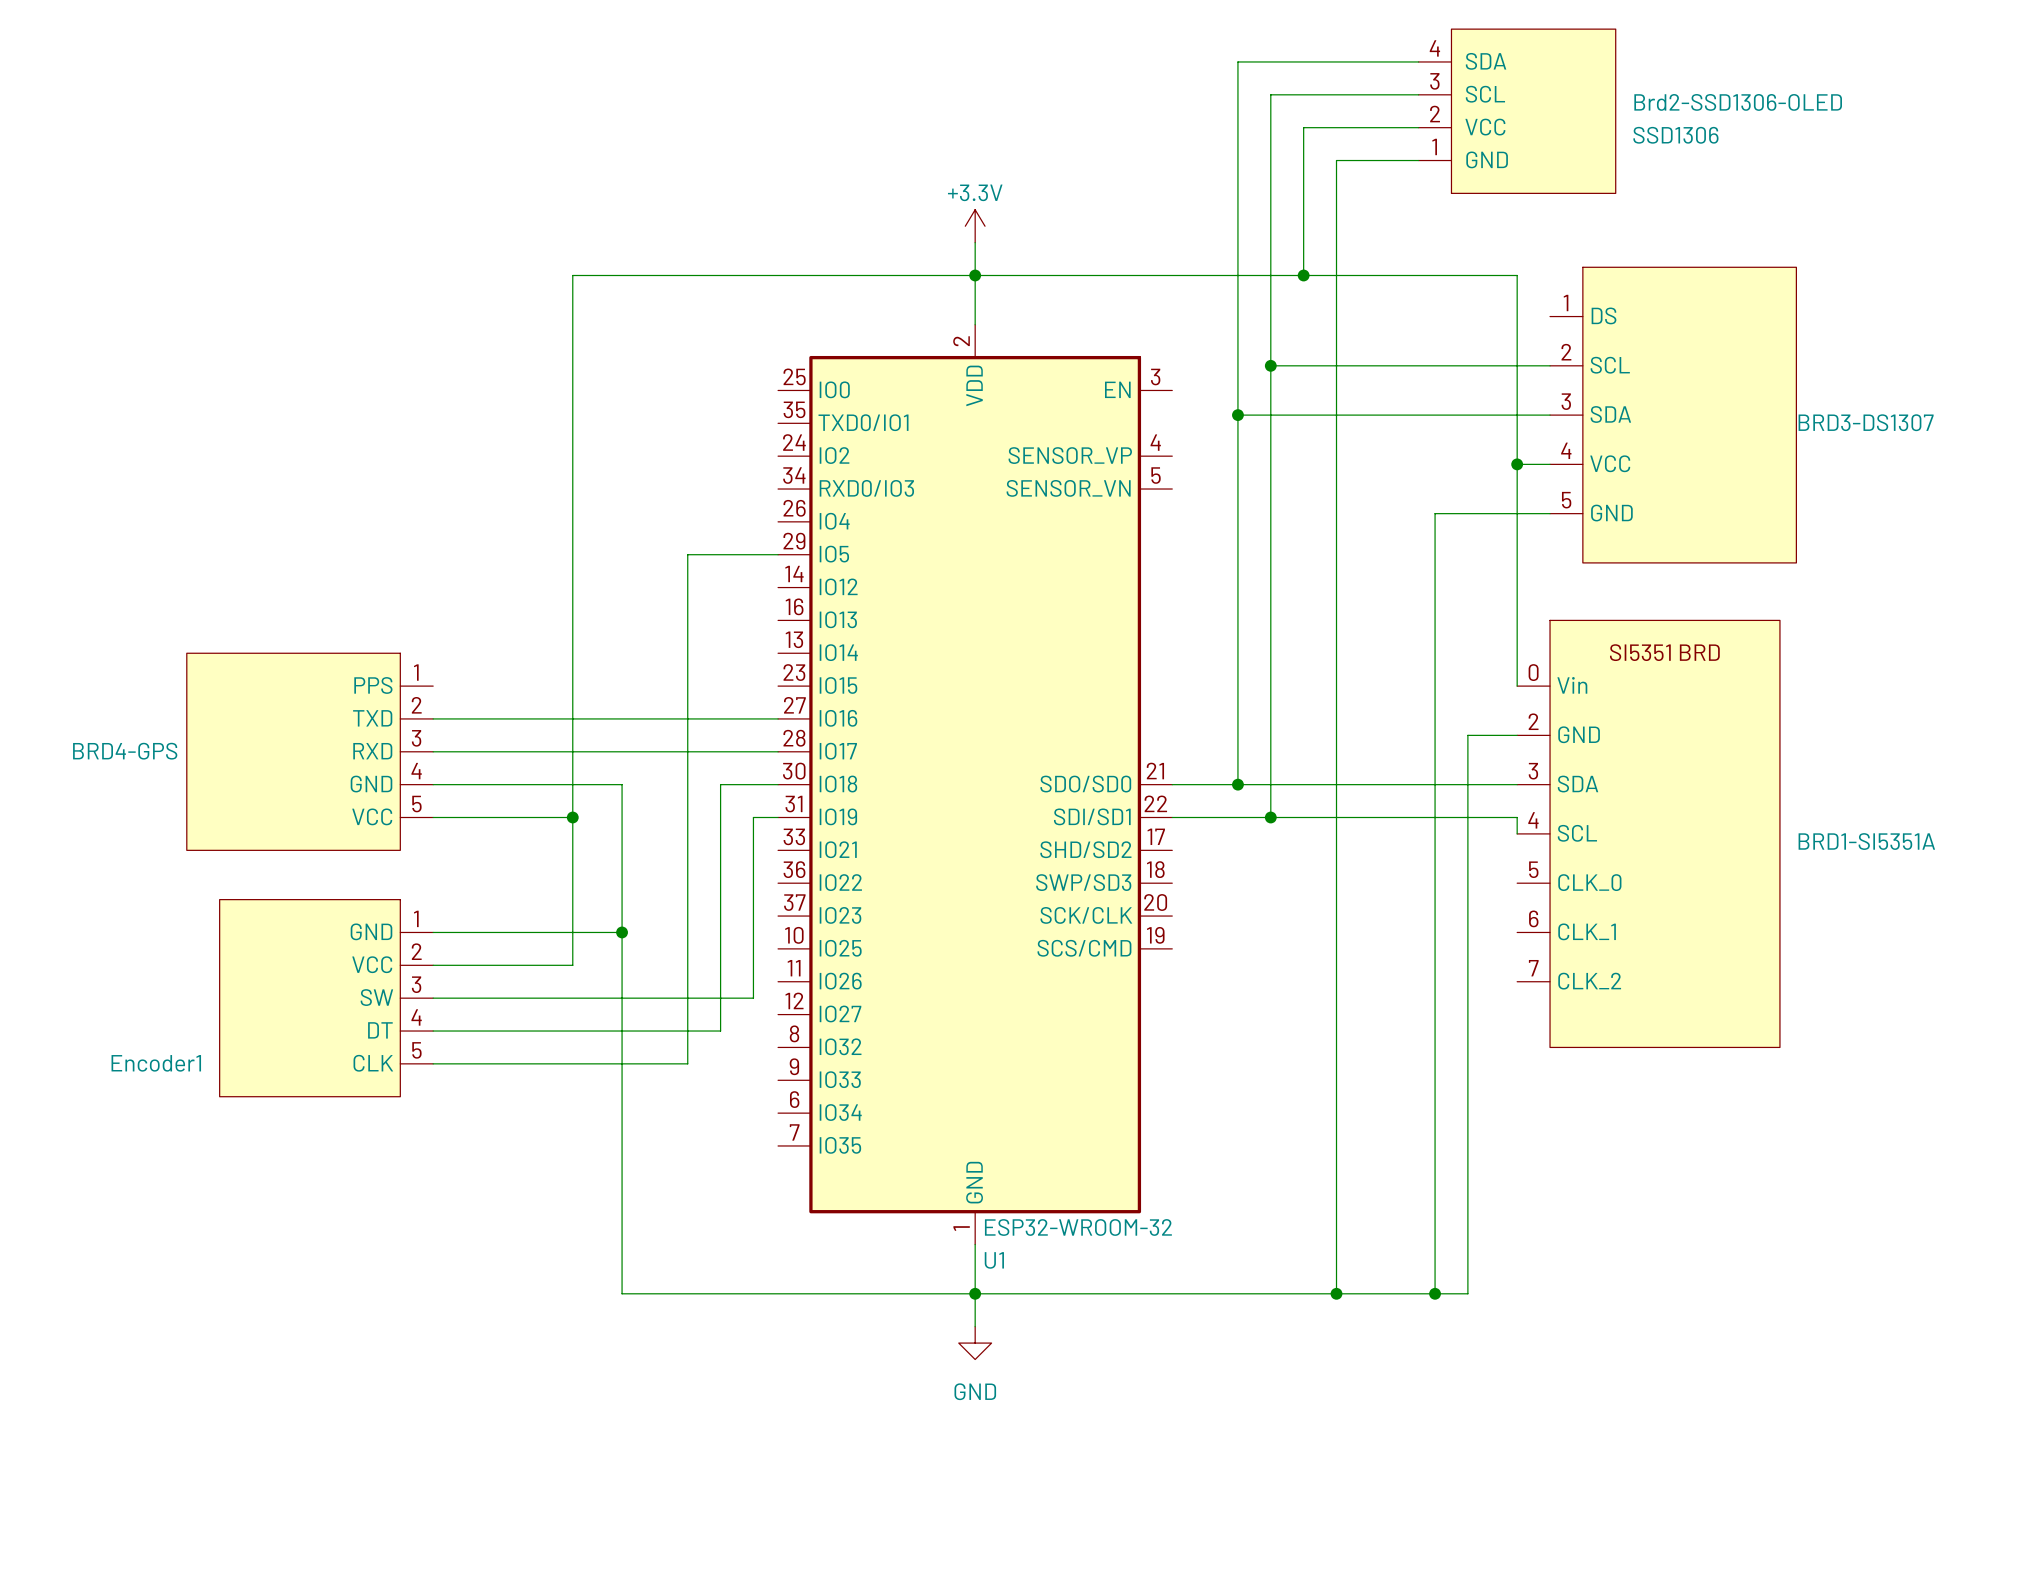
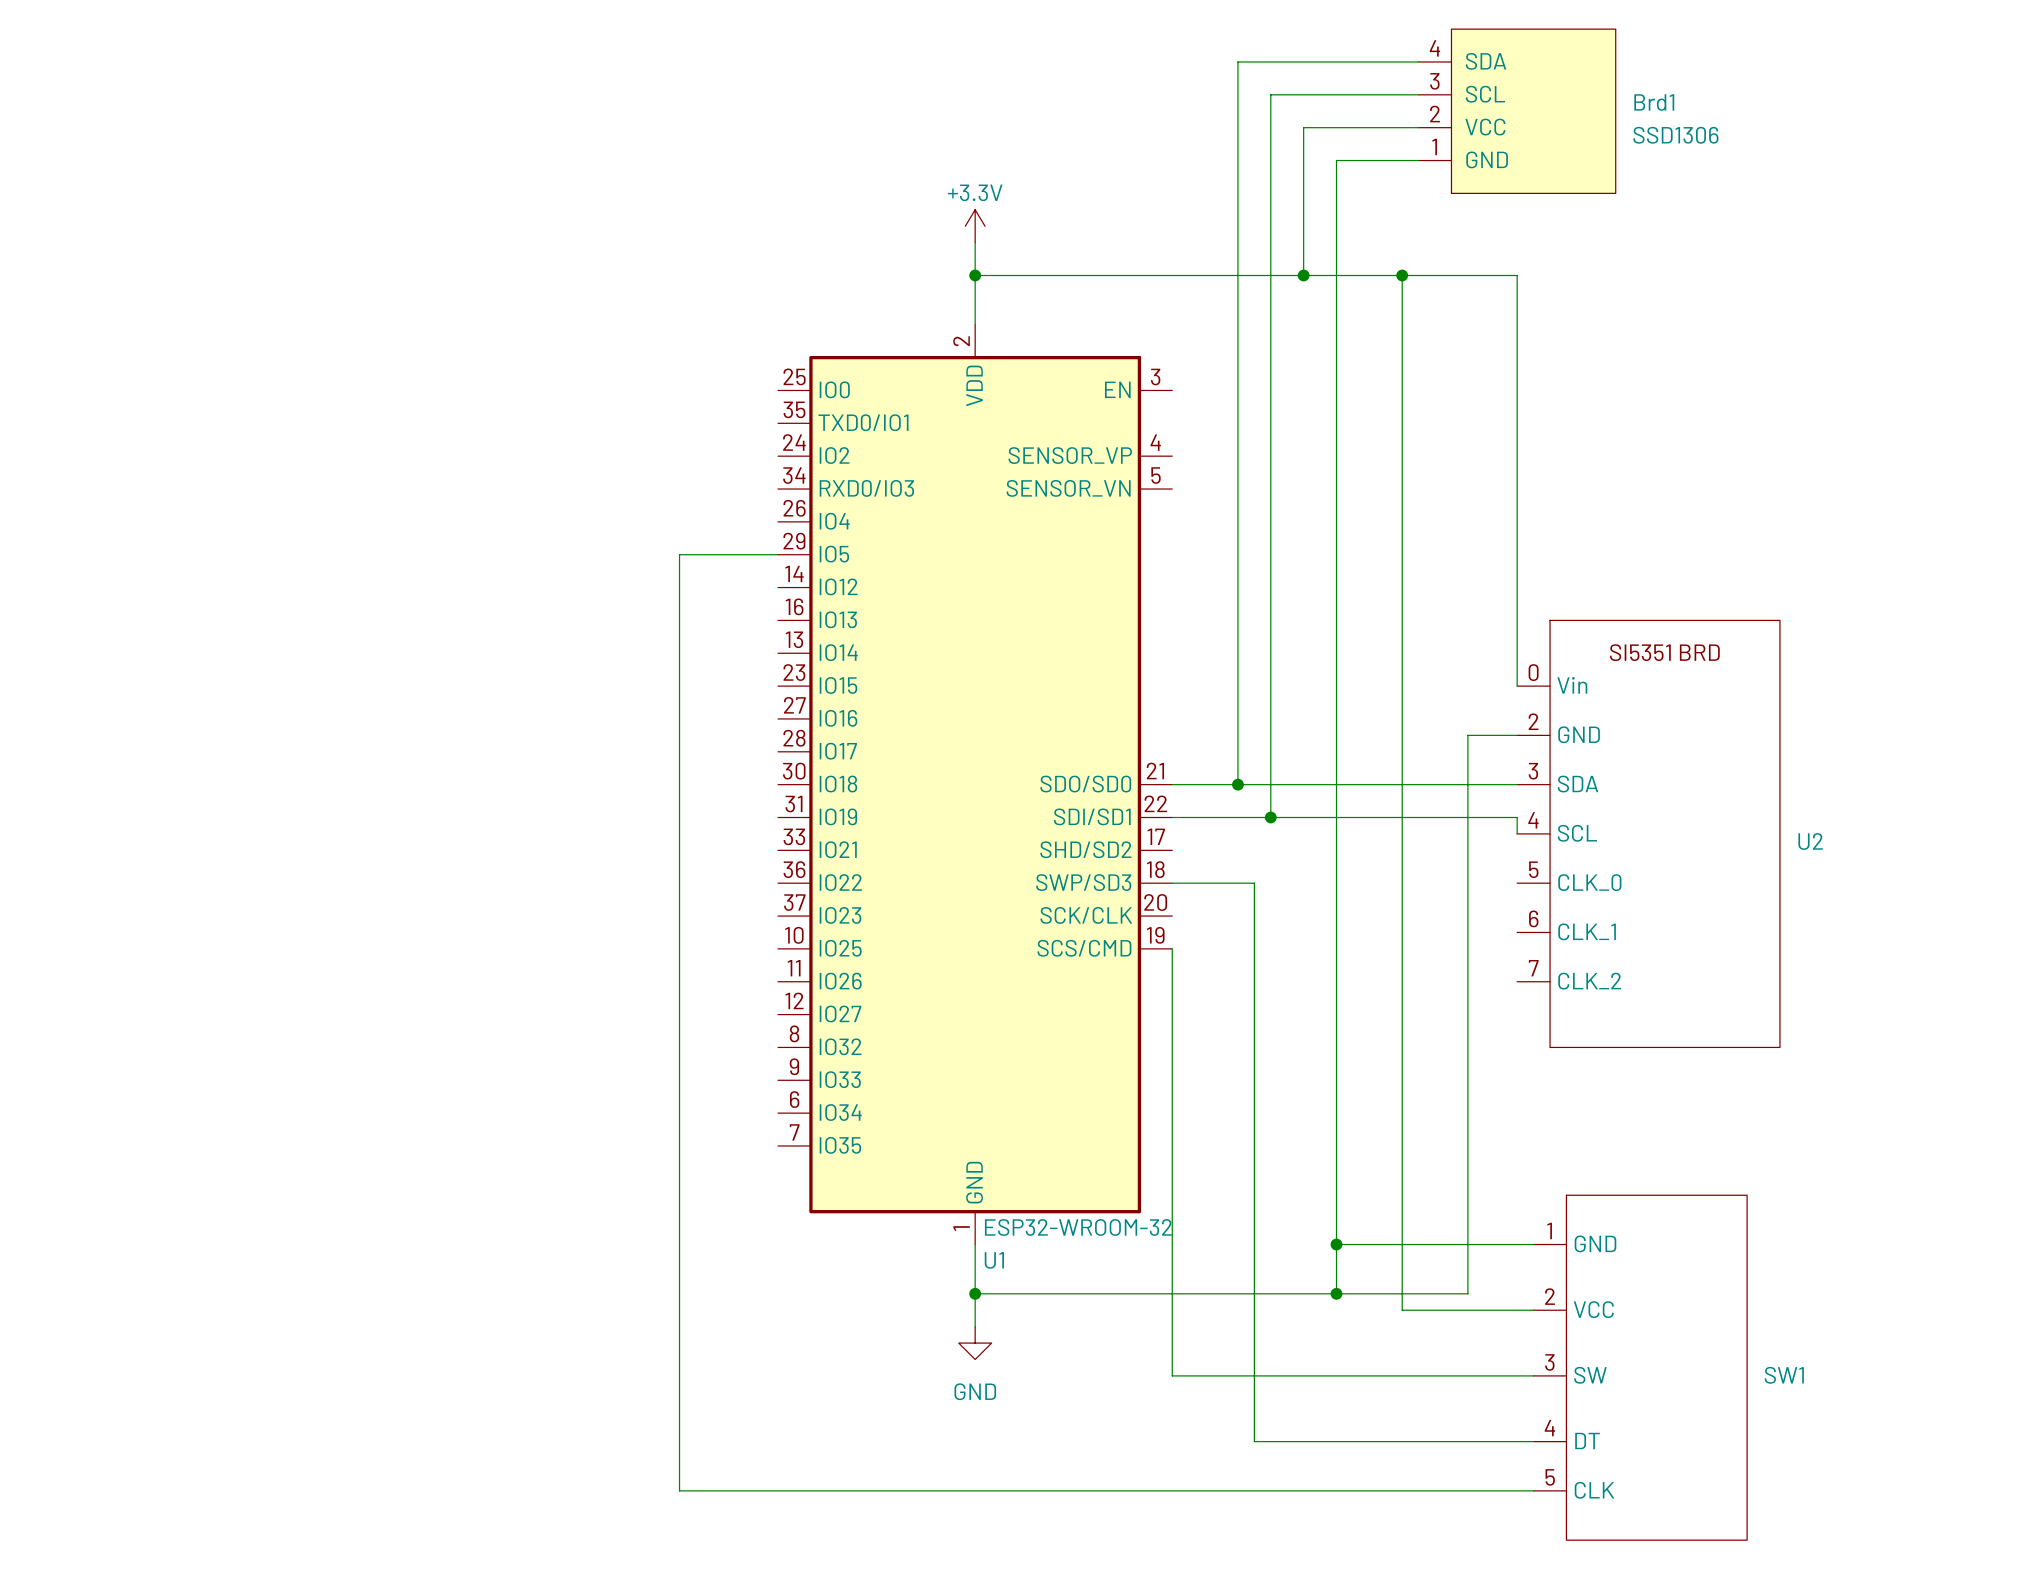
Brd2-SSD1306-OLED name: Brd2-SSD1306-OLED (1738, 102) -> Brd1 (1654, 102)
wire: (975, 275) (572, 275) (572, 965) (433, 965) -> none
wire: none -> (1402, 275) (1402, 1310) (1533, 1310)
junction: none -> (1402, 275)
wire: (1270, 365) (1550, 365) -> none
junction: (1270, 365) -> none
wire: (1237, 415) (1550, 415) -> none
junction: (1237, 415) -> none
BRD3-DS1307: (1673, 415) -> none
wire: (1517, 464) (1550, 464) -> none
junction: (1517, 464) -> none
wire: (1550, 513) (1435, 513) (1435, 1293) -> none
wire: (687, 554) (687, 1063) (433, 1063) -> (687, 554) (679, 554) (679, 1490) (1533, 1490)
wire: (433, 718) (778, 718) -> none
BRD4-GPS: (309, 743) -> none
wire: (433, 751) (778, 751) -> none
wire: (433, 784) (622, 784) (622, 1293) (975, 1293) -> none
wire: (778, 784) (720, 784) (720, 1031) (433, 1031) -> none
wire: (433, 817) (572, 817) -> none
junction: (572, 817) -> none
wire: (778, 817) (753, 817) (753, 998) (433, 998) -> none
BRD1-SI5351A: (1648, 833) -> none
U2: none -> (1648, 833)
wire: none -> (1172, 883) (1254, 883) (1254, 1441) (1533, 1441)
wire: (433, 932) (622, 932) -> none
junction: (622, 932) -> none
wire: none -> (1172, 948) (1172, 1375) (1533, 1375)
Encoder1: (326, 998) -> none
wire: none -> (1336, 1244) (1533, 1244)
junction: none -> (1336, 1244)
junction: (1435, 1293) -> none
SW1: none -> (1640, 1367)

